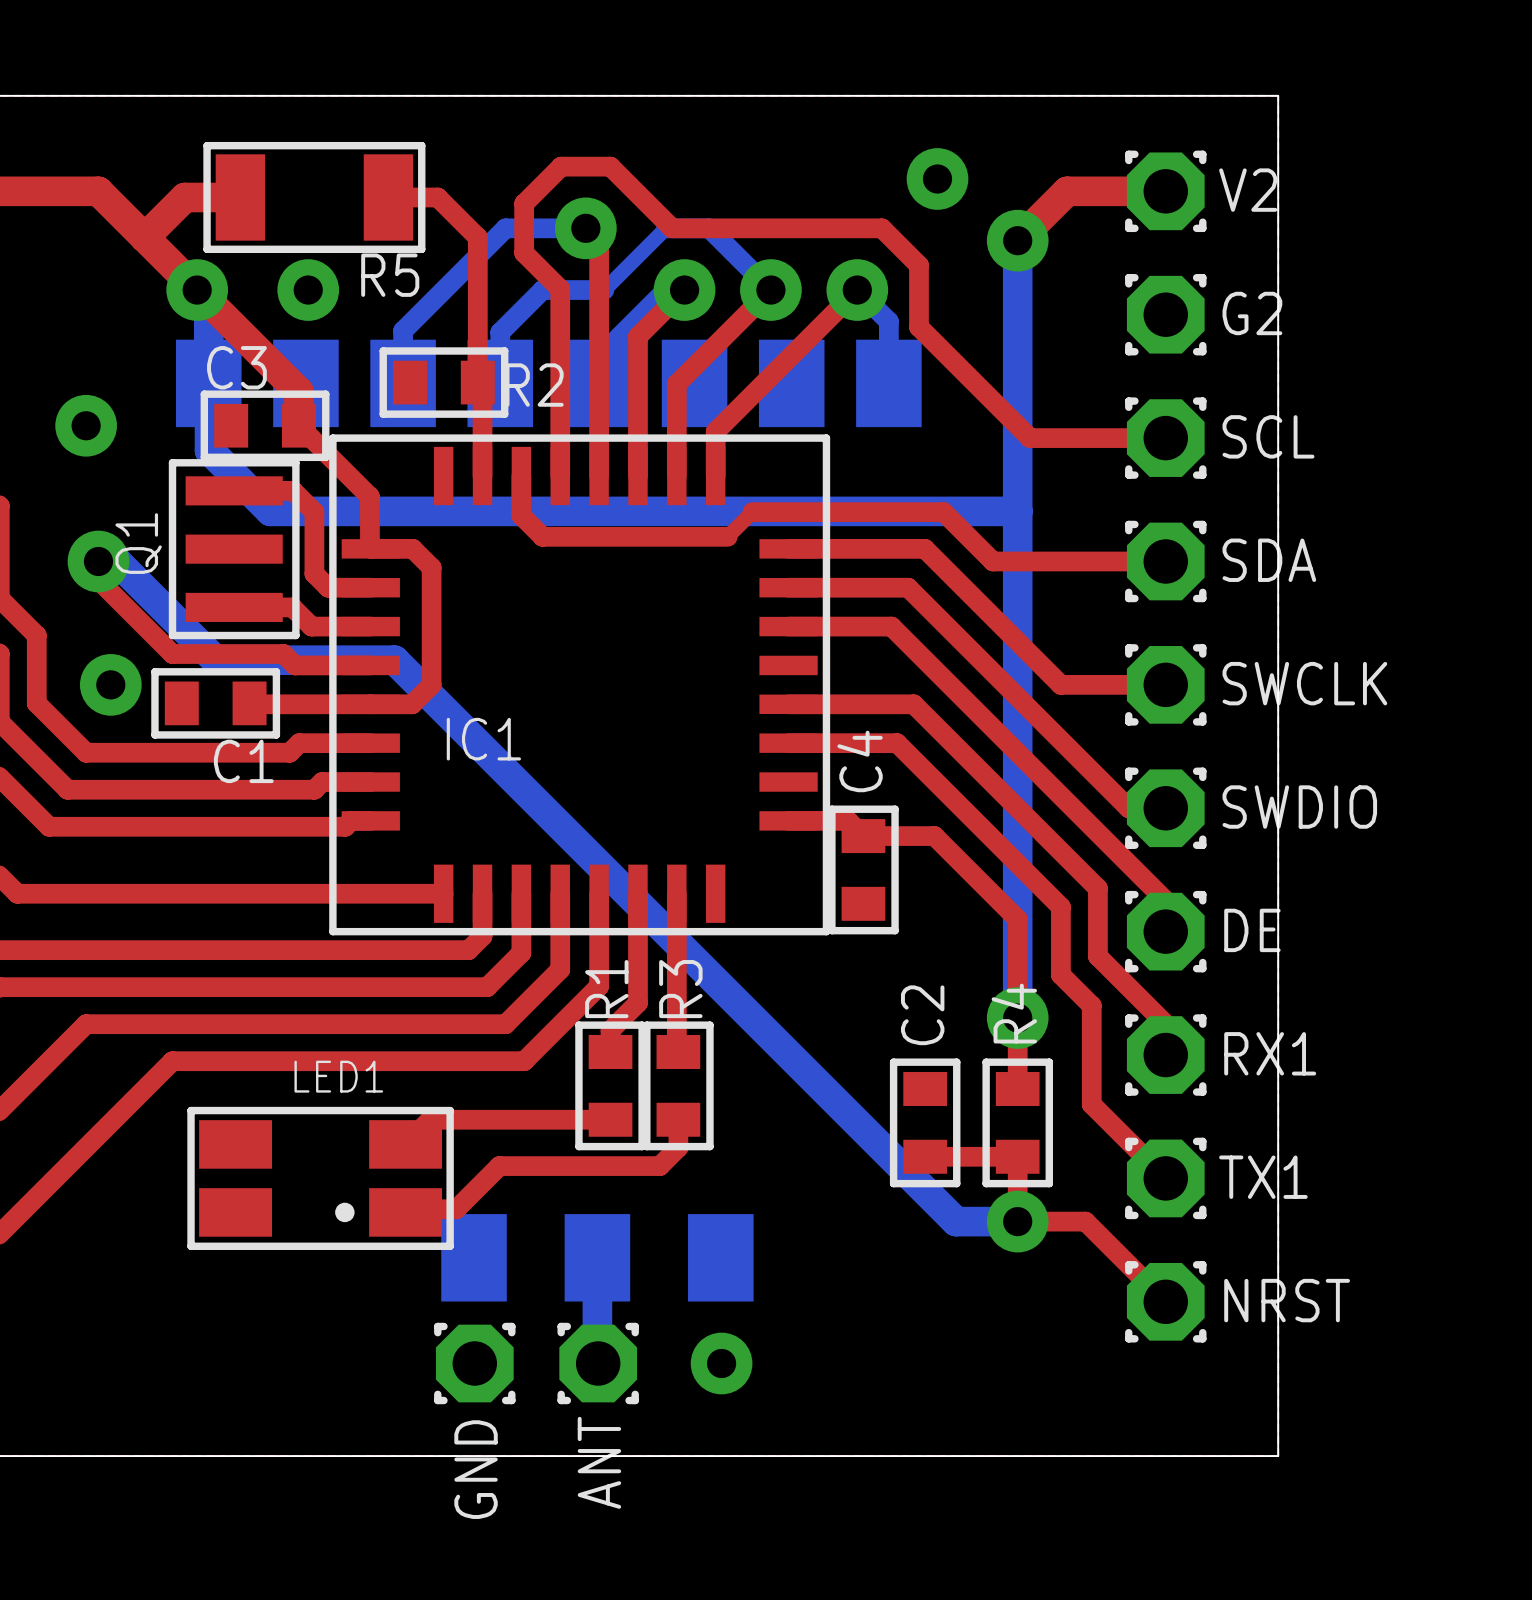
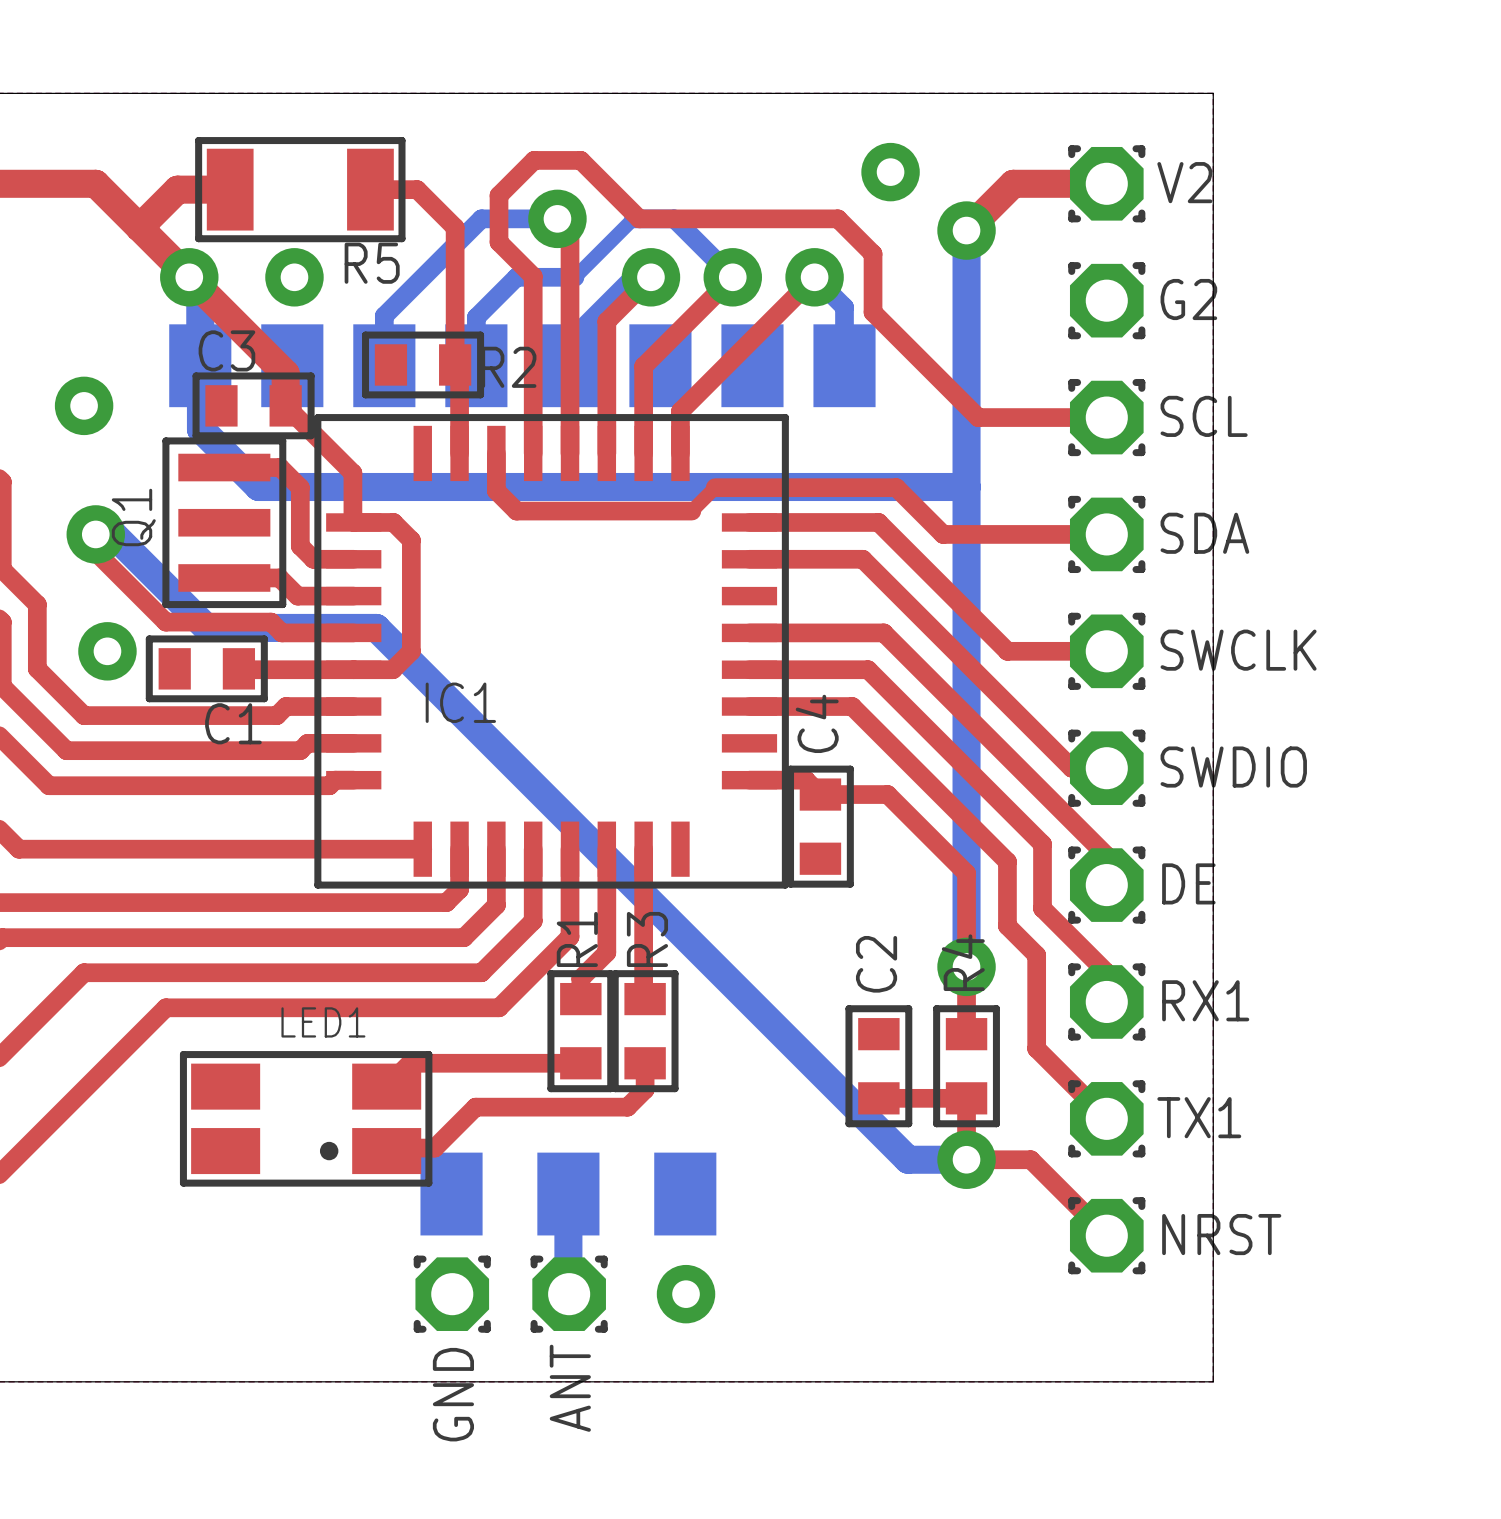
top track: (788, 626) (891, 626) (930, 665) -> (749, 632) (883, 632)

